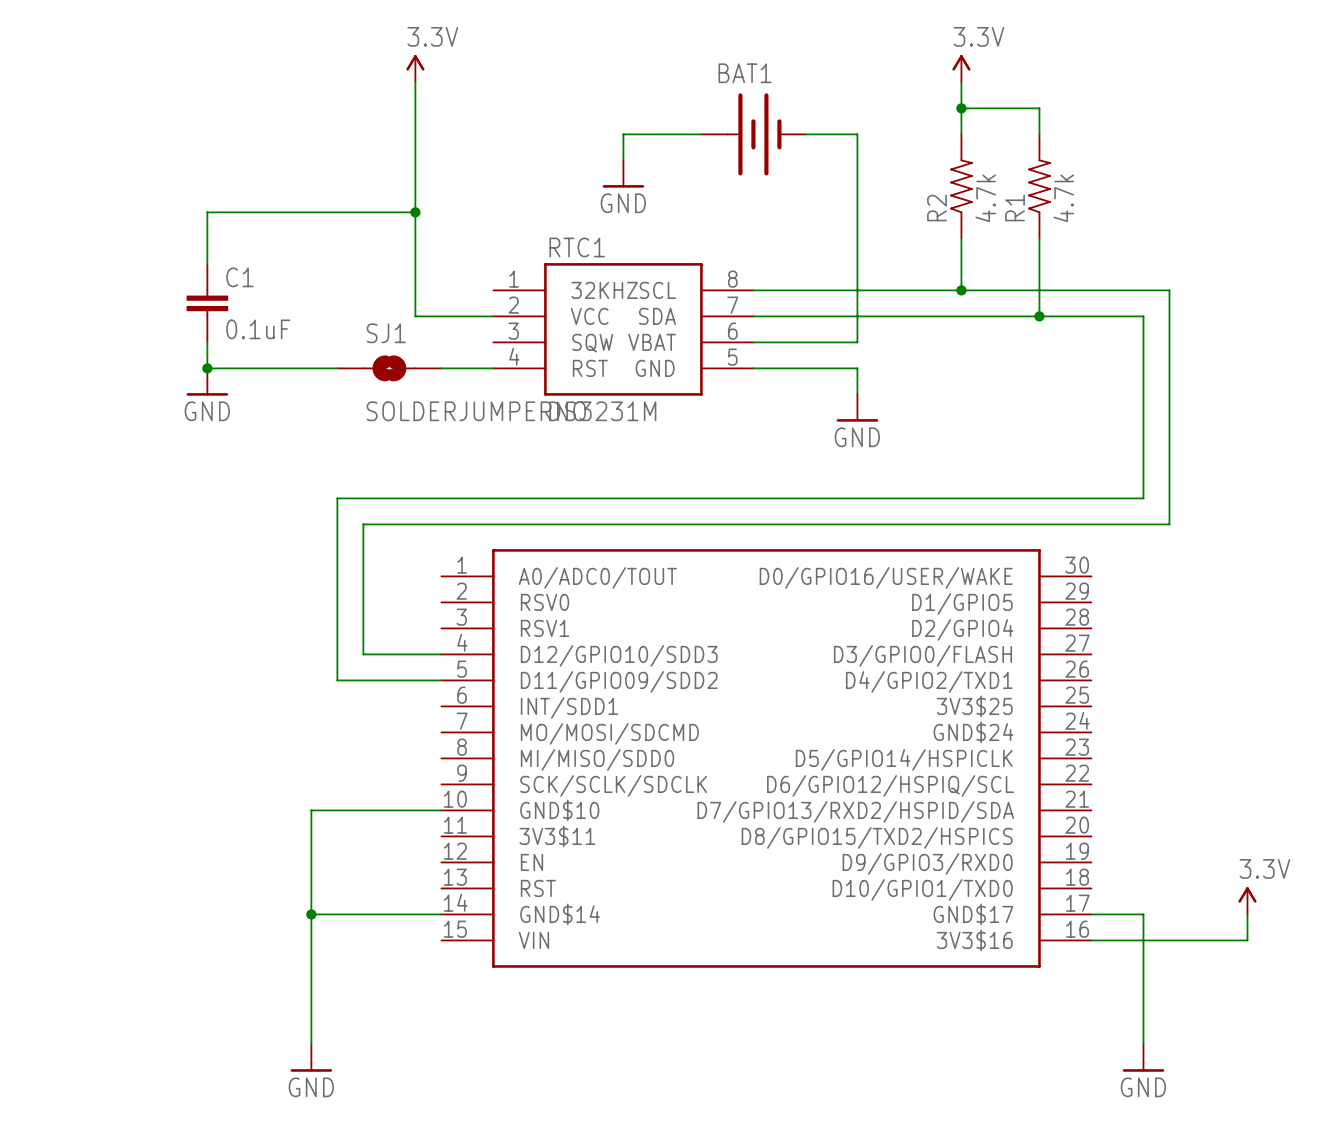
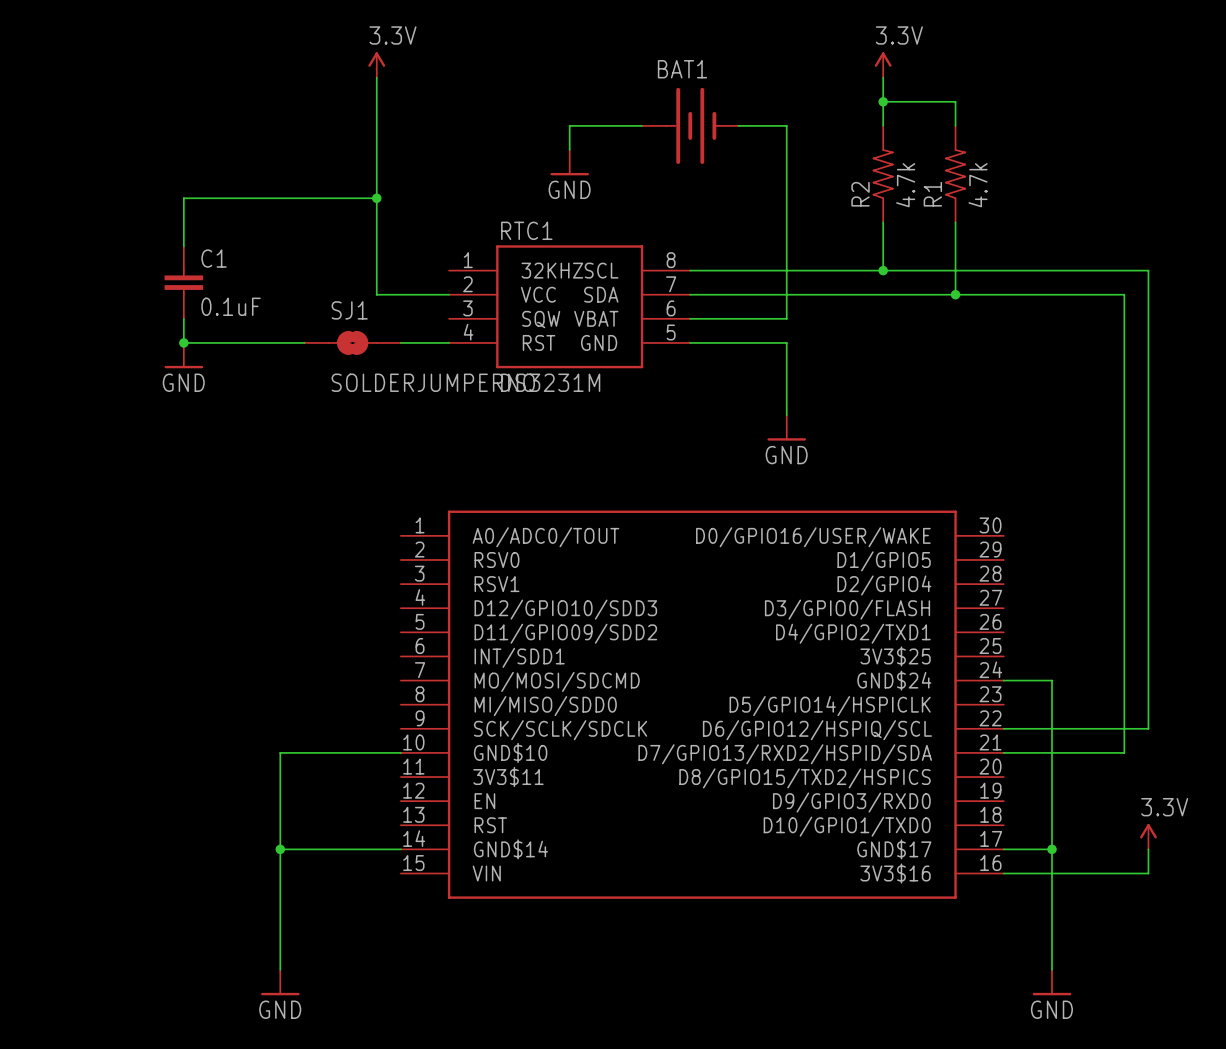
wire: (1169, 290) (1169, 524) (363, 524) (363, 654) (441, 654) -> (1076, 270) (1148, 270) (1148, 728) (1003, 728)
wire: (1143, 316) (1143, 498) (337, 498) (337, 680) (441, 680) -> (1051, 294) (1124, 294) (1124, 752) (1003, 752)
power symbol position: GND (857, 408) -> GND (786, 427)
wire: none -> (1003, 680) (1051, 680) (1051, 849)
junction: none -> (1051, 849)

